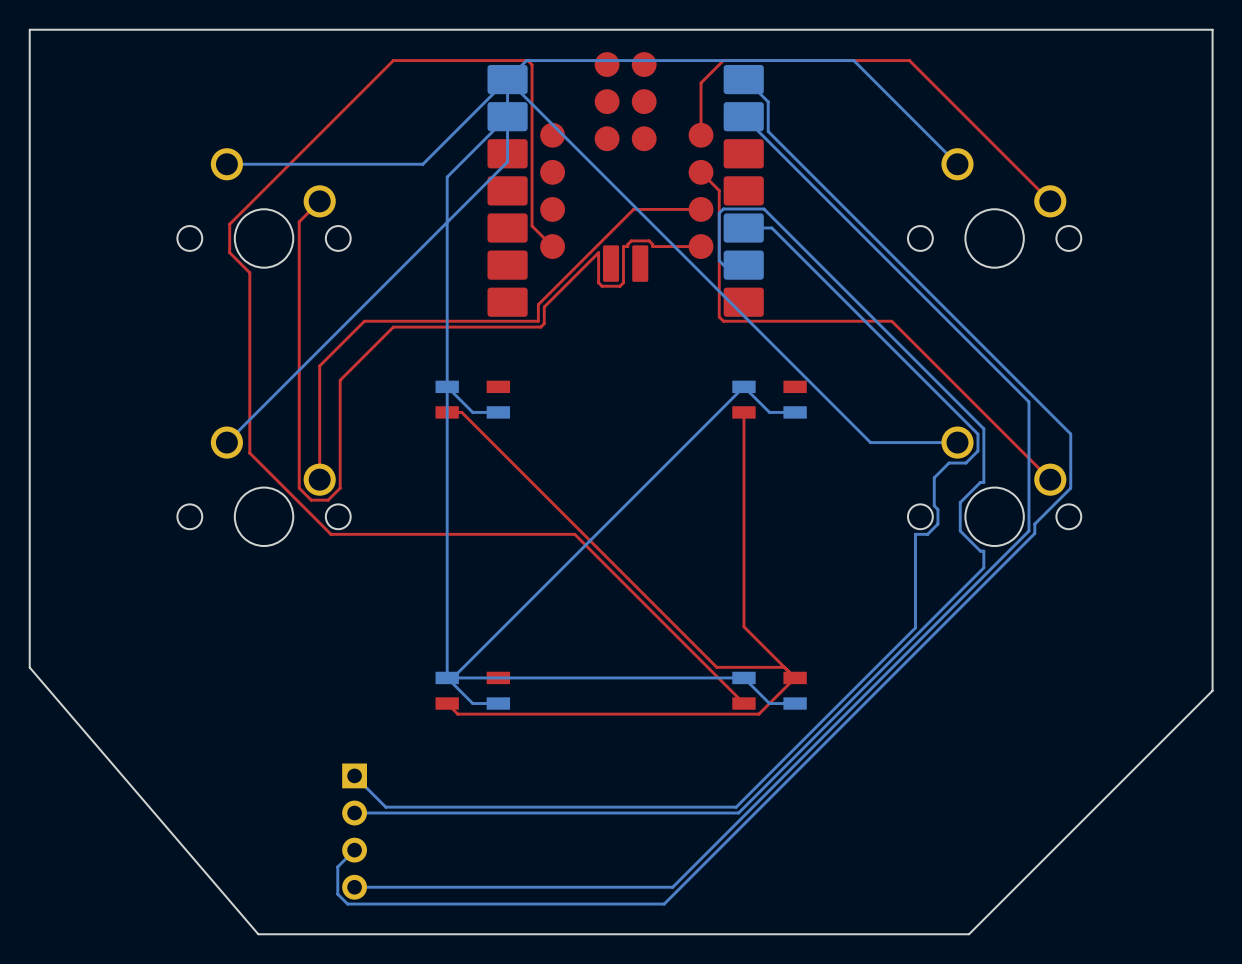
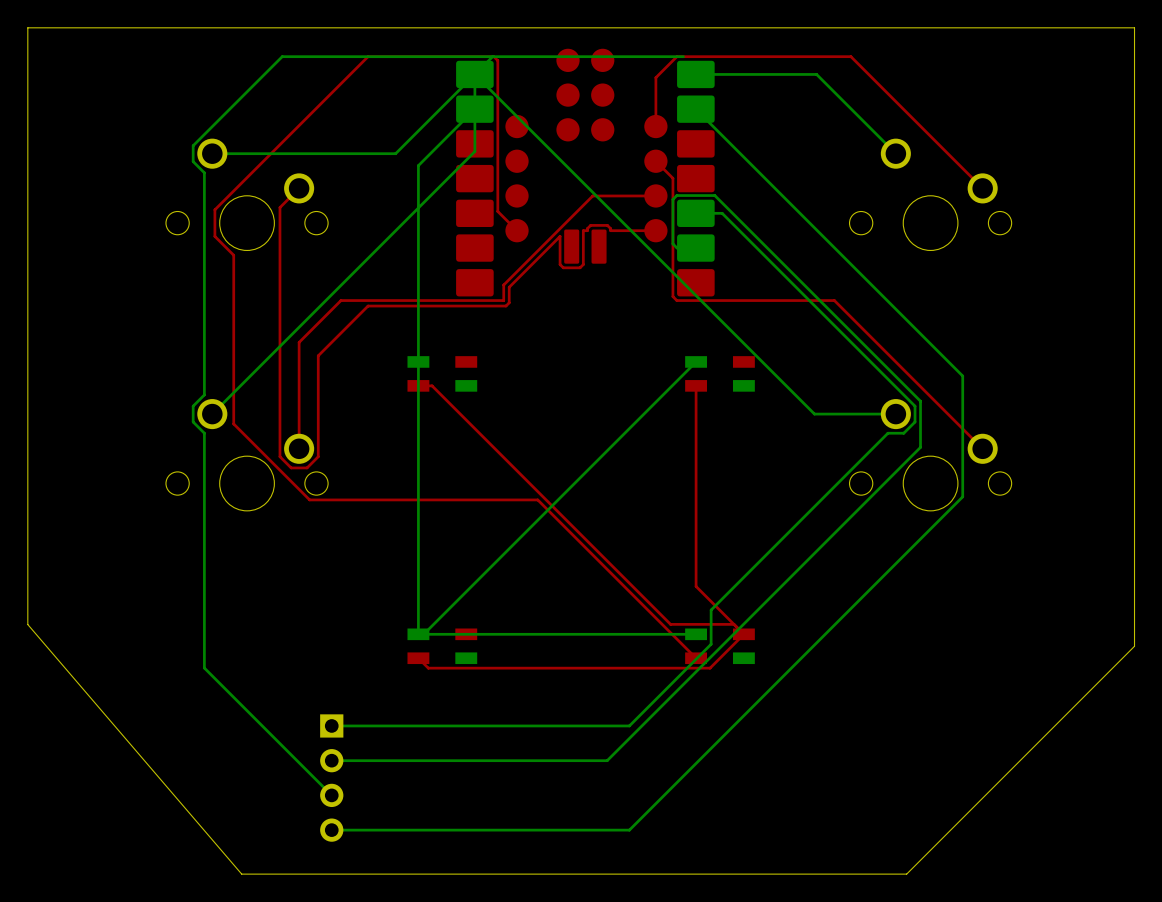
bottom track: (730, 60) (853, 60) (872, 79) -> (697, 74) (816, 74)
bottom track: (745, 79) (768, 101) (768, 131) (1070, 434) (1070, 488) (1034, 524) (1034, 533) (664, 904) (347, 904) (337, 894) (337, 866) (354, 850) -> (492, 56) (282, 56) (193, 145) (193, 161) (204, 172) (204, 394) (193, 406) (193, 422) (204, 433) (204, 668) (331, 795)
bottom track: (447, 386) (472, 412) (498, 412) -> none
bottom track: (743, 386) (769, 412) (795, 412) -> none
bottom track: (934, 477) (934, 505) (937, 509) (937, 524) -> (920, 447) (877, 490)
bottom track: (983, 478) (983, 482) (980, 482) (960, 502) (960, 531) (980, 551) (983, 551) (983, 567) (738, 813) (648, 813) -> (867, 499) (607, 760)
bottom track: (927, 534) (915, 534) (915, 627) (736, 807) (385, 807) (354, 775) -> (874, 447) (711, 610) (711, 644) (629, 725) (331, 725)
bottom track: (447, 677) (472, 703) (498, 703) -> none
bottom track: (743, 677) (769, 703) (795, 703) -> none

